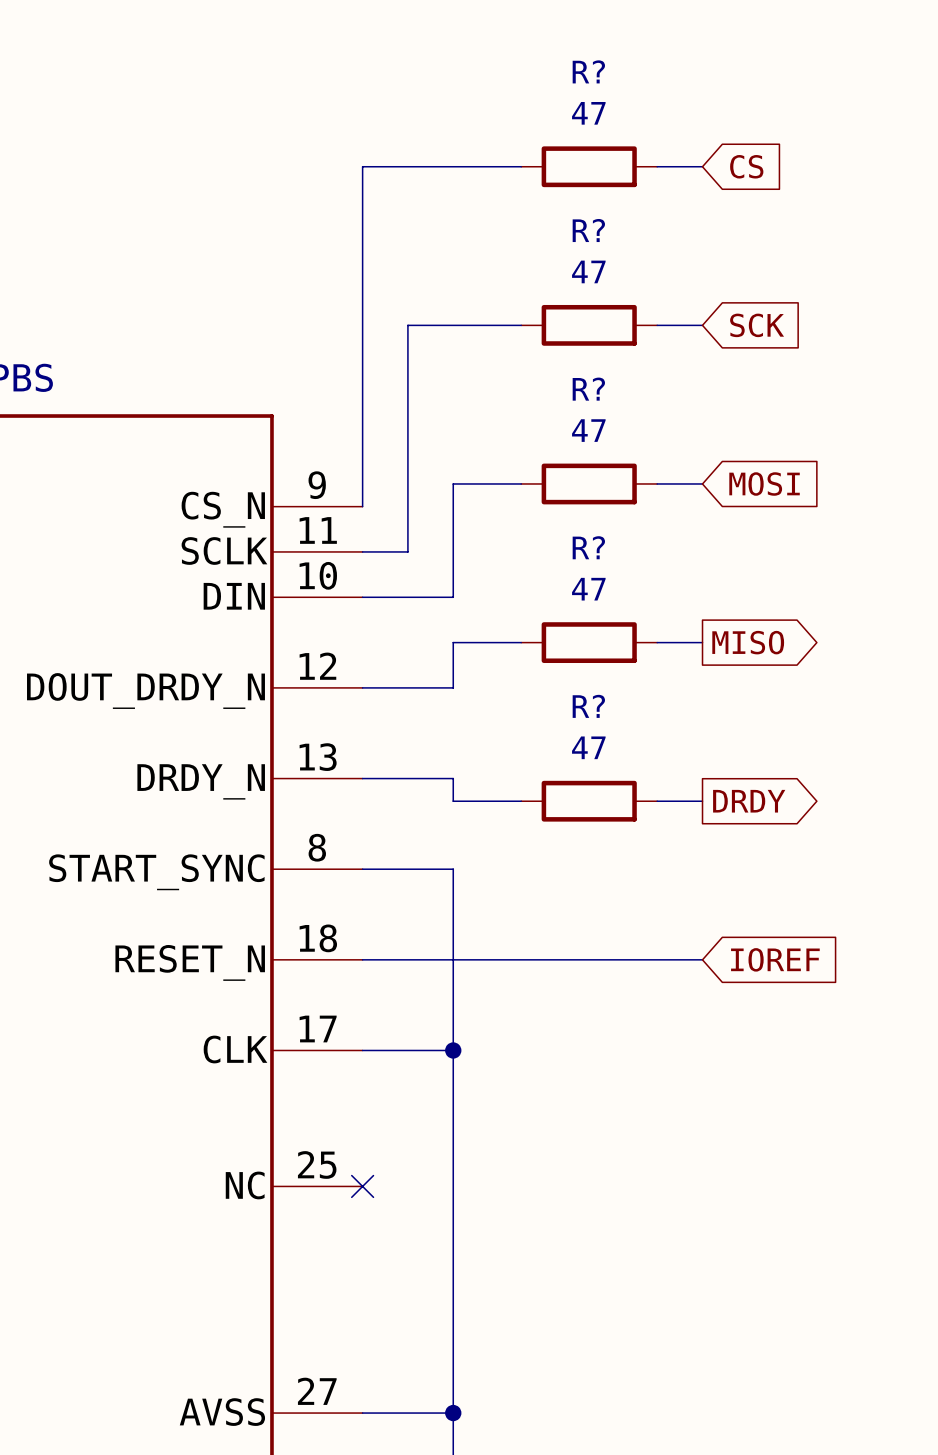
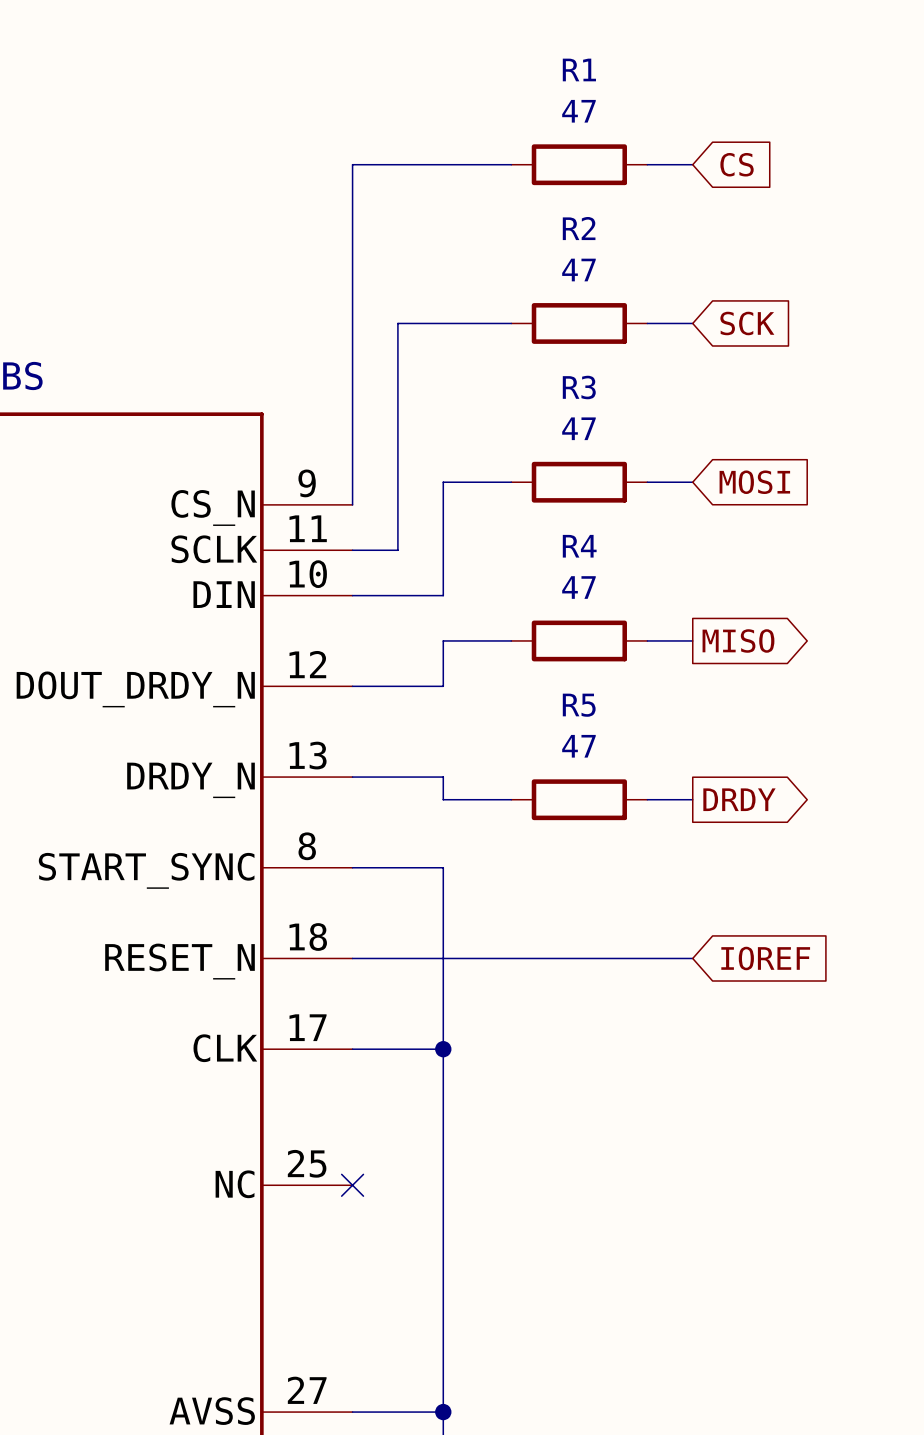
R? name: R? (588, 71) -> R1 (579, 69)
R? name: R? (588, 230) -> R2 (579, 228)
R? name: R? (588, 389) -> R3 (579, 387)
R? name: R? (588, 547) -> R4 (579, 546)
R? name: R? (588, 706) -> R5 (579, 705)

